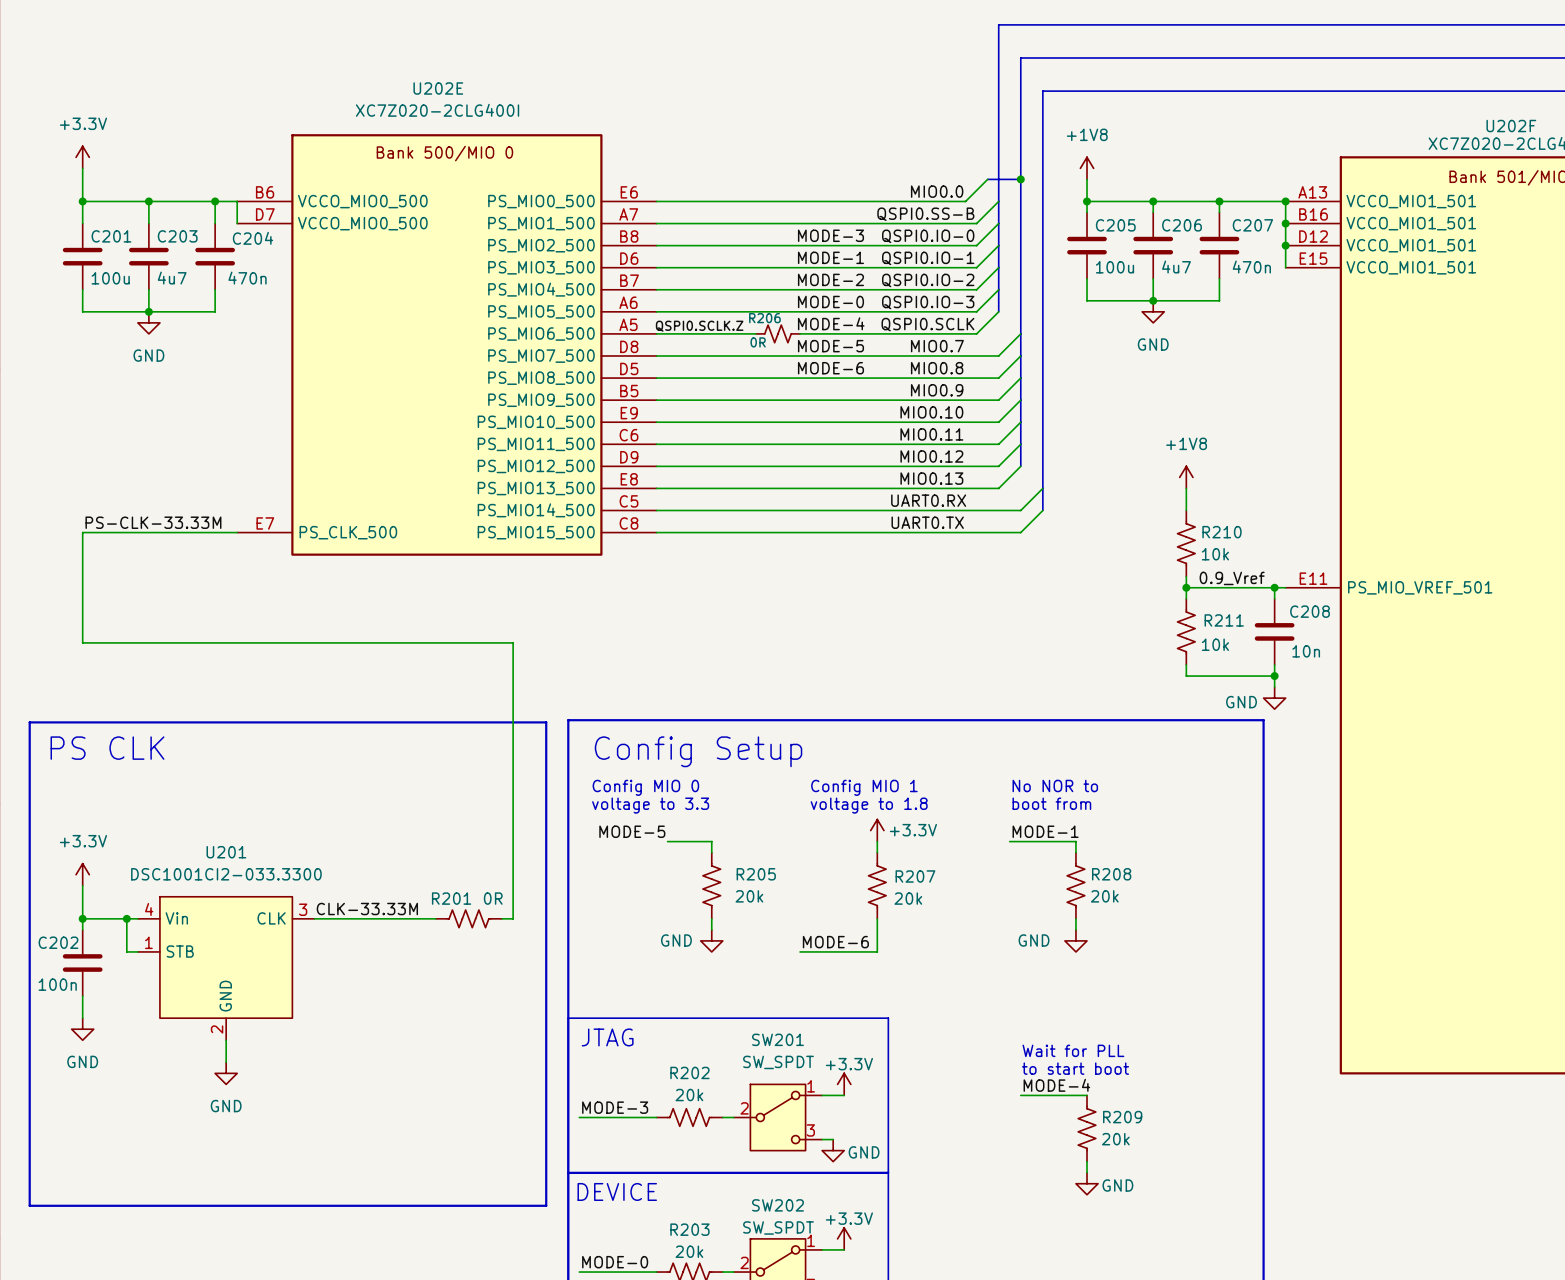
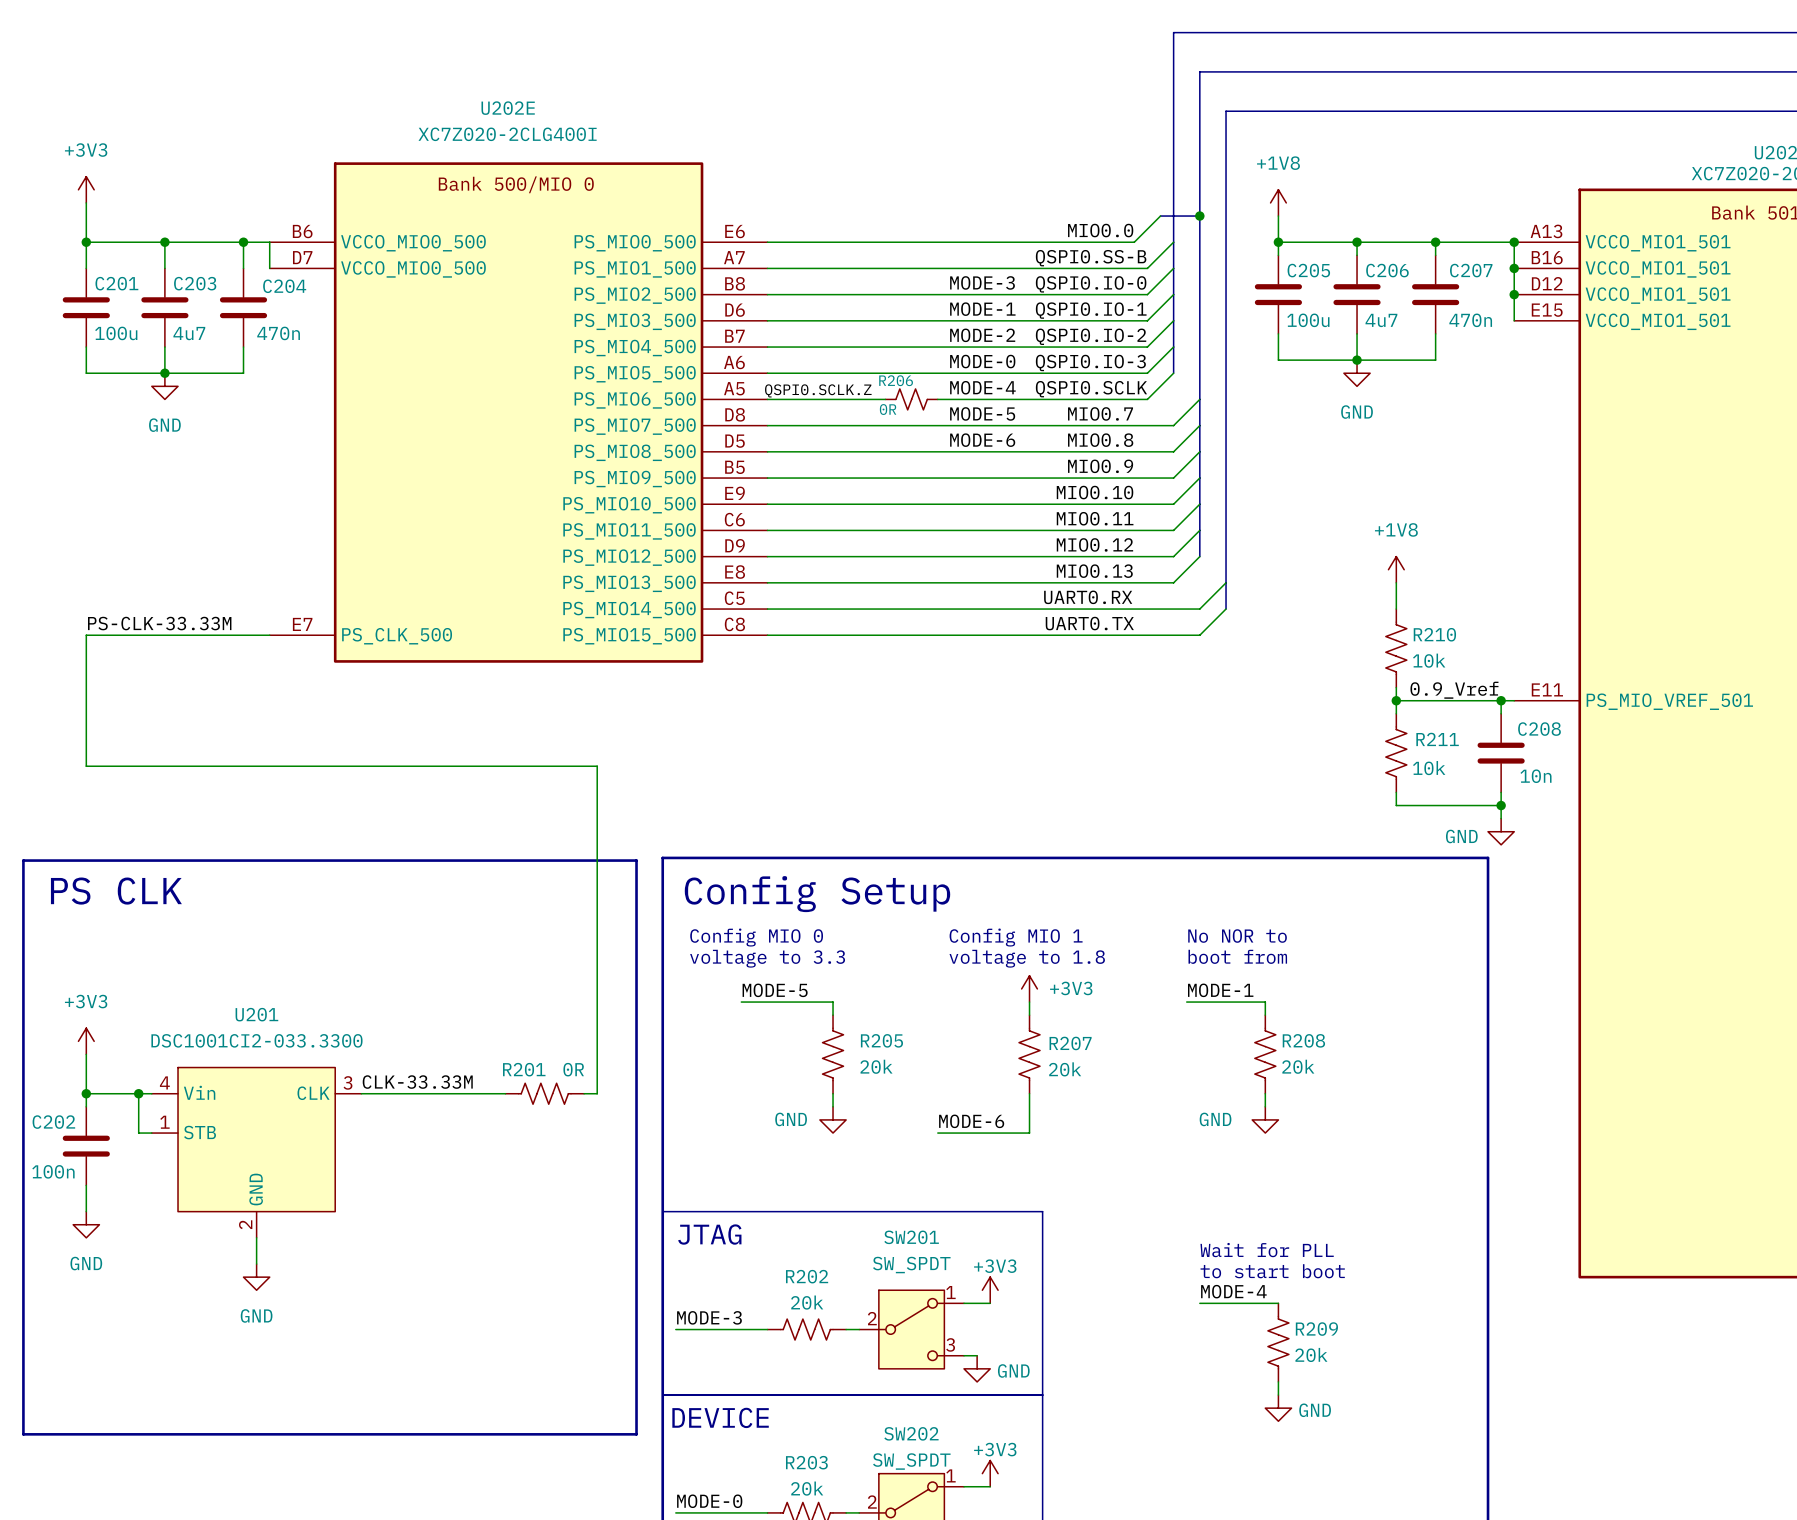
power symbol: +3.3V (82, 157) -> +3V3 (86, 189)
power symbol: +3.3V (877, 830) -> +3V3 (1029, 988)
label position: MODE-5 (632, 831) -> MODE-5 (775, 990)
wire: none -> (741, 1002) (780, 1002)
power symbol: +3.3V (82, 874) -> +3V3 (86, 1041)
power symbol: +3.3V (844, 1084) -> +3V3 (990, 1290)
power symbol: +3.3V (844, 1238) -> +3V3 (990, 1473)

